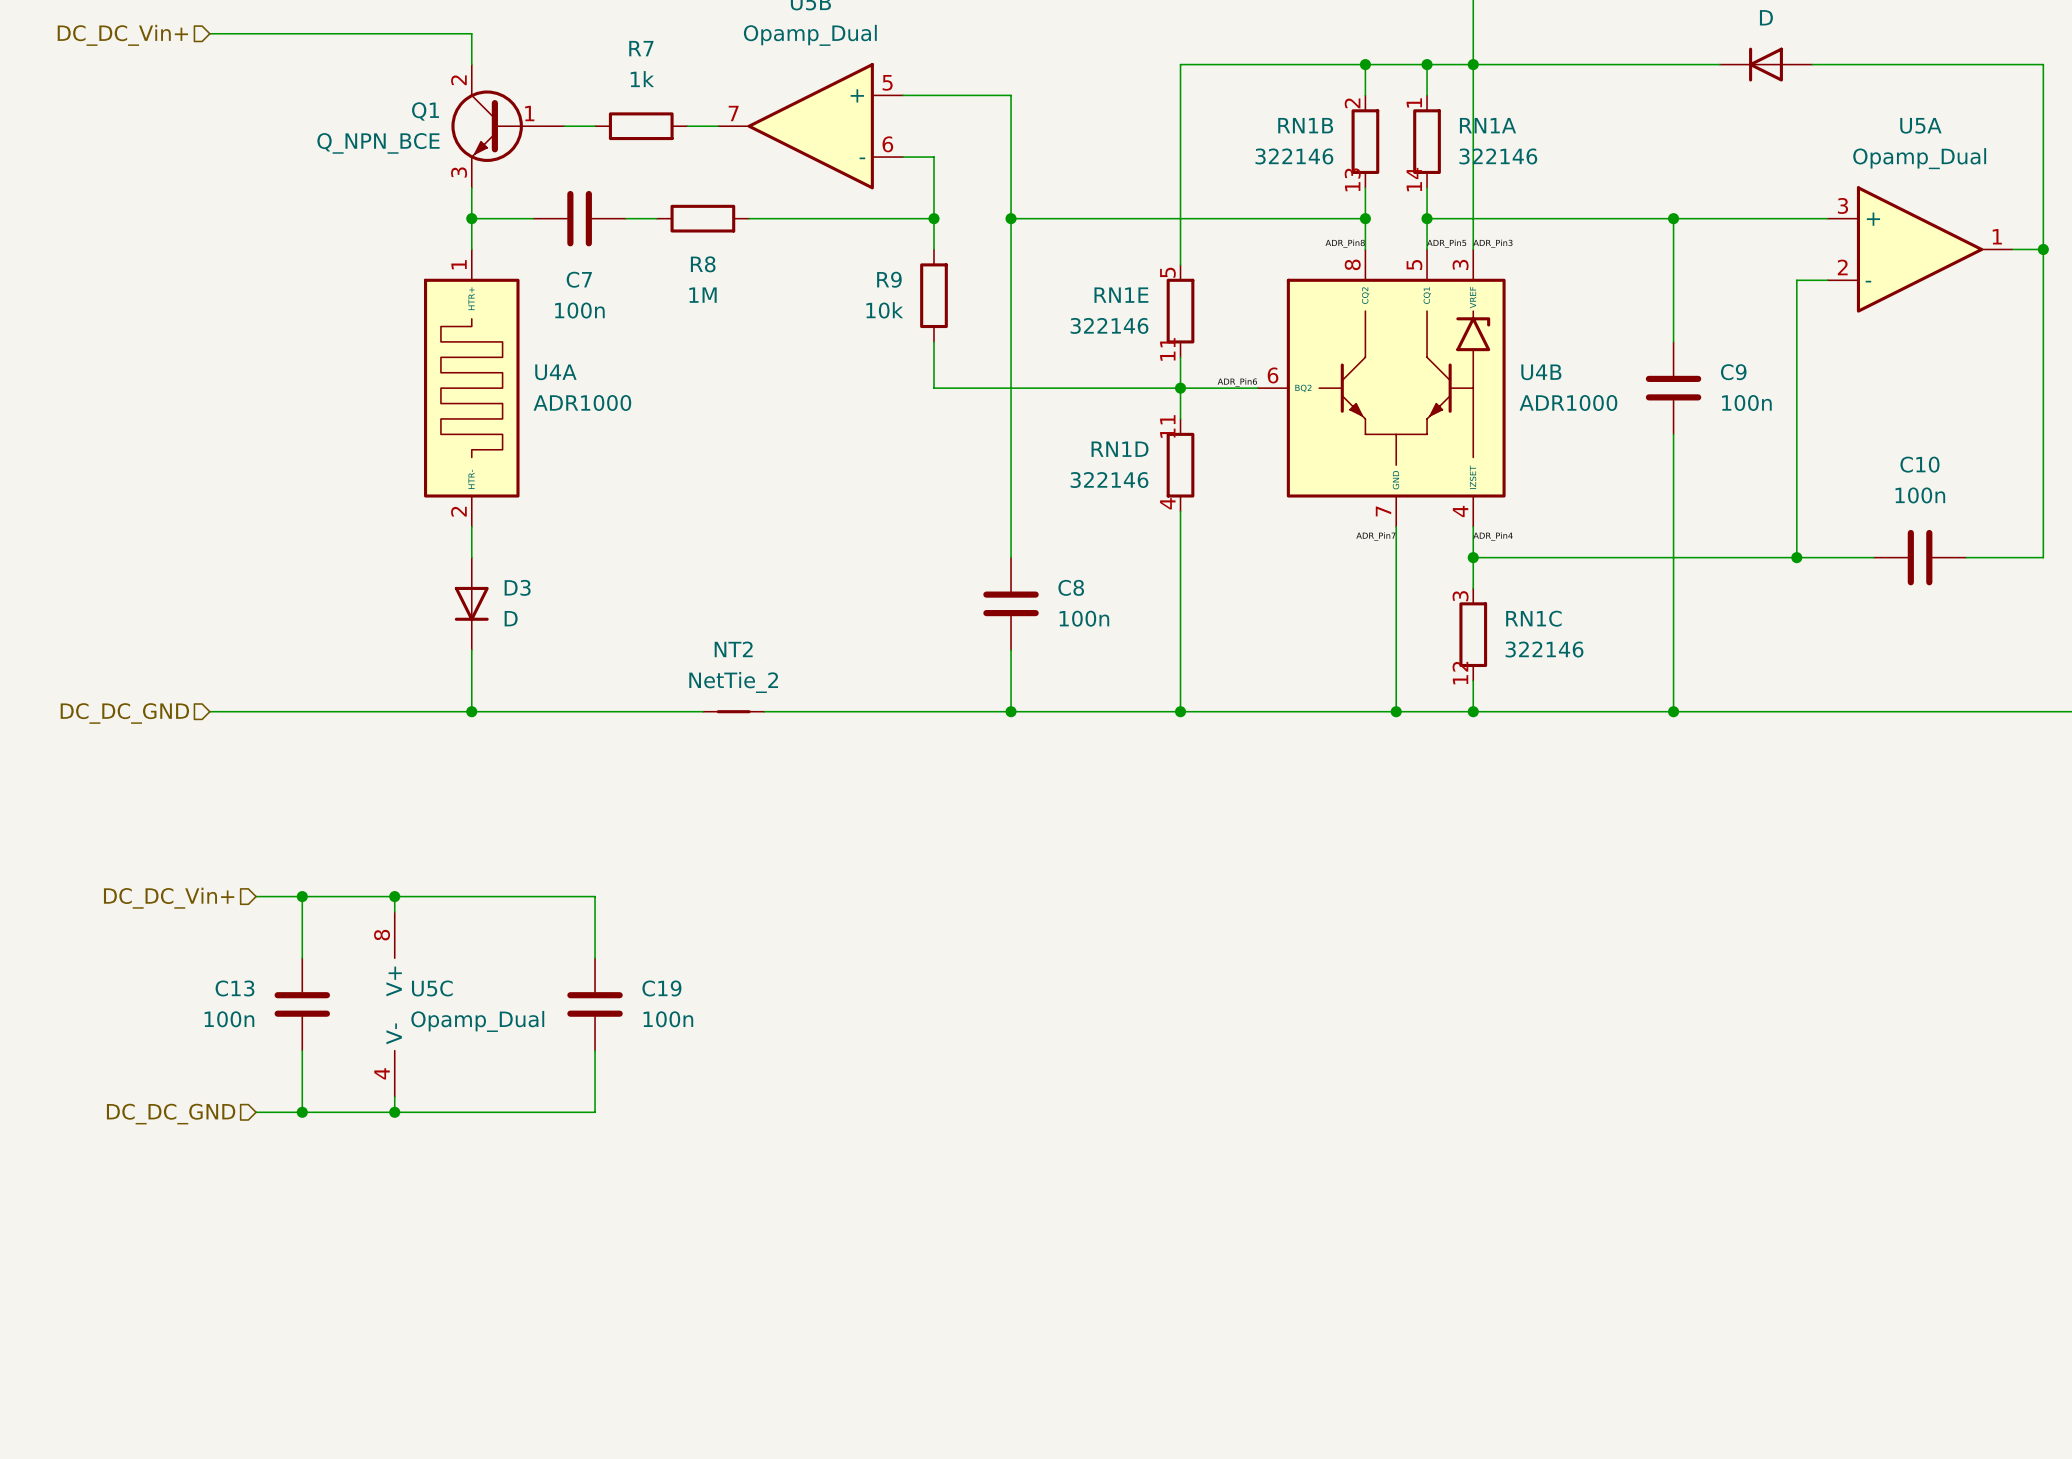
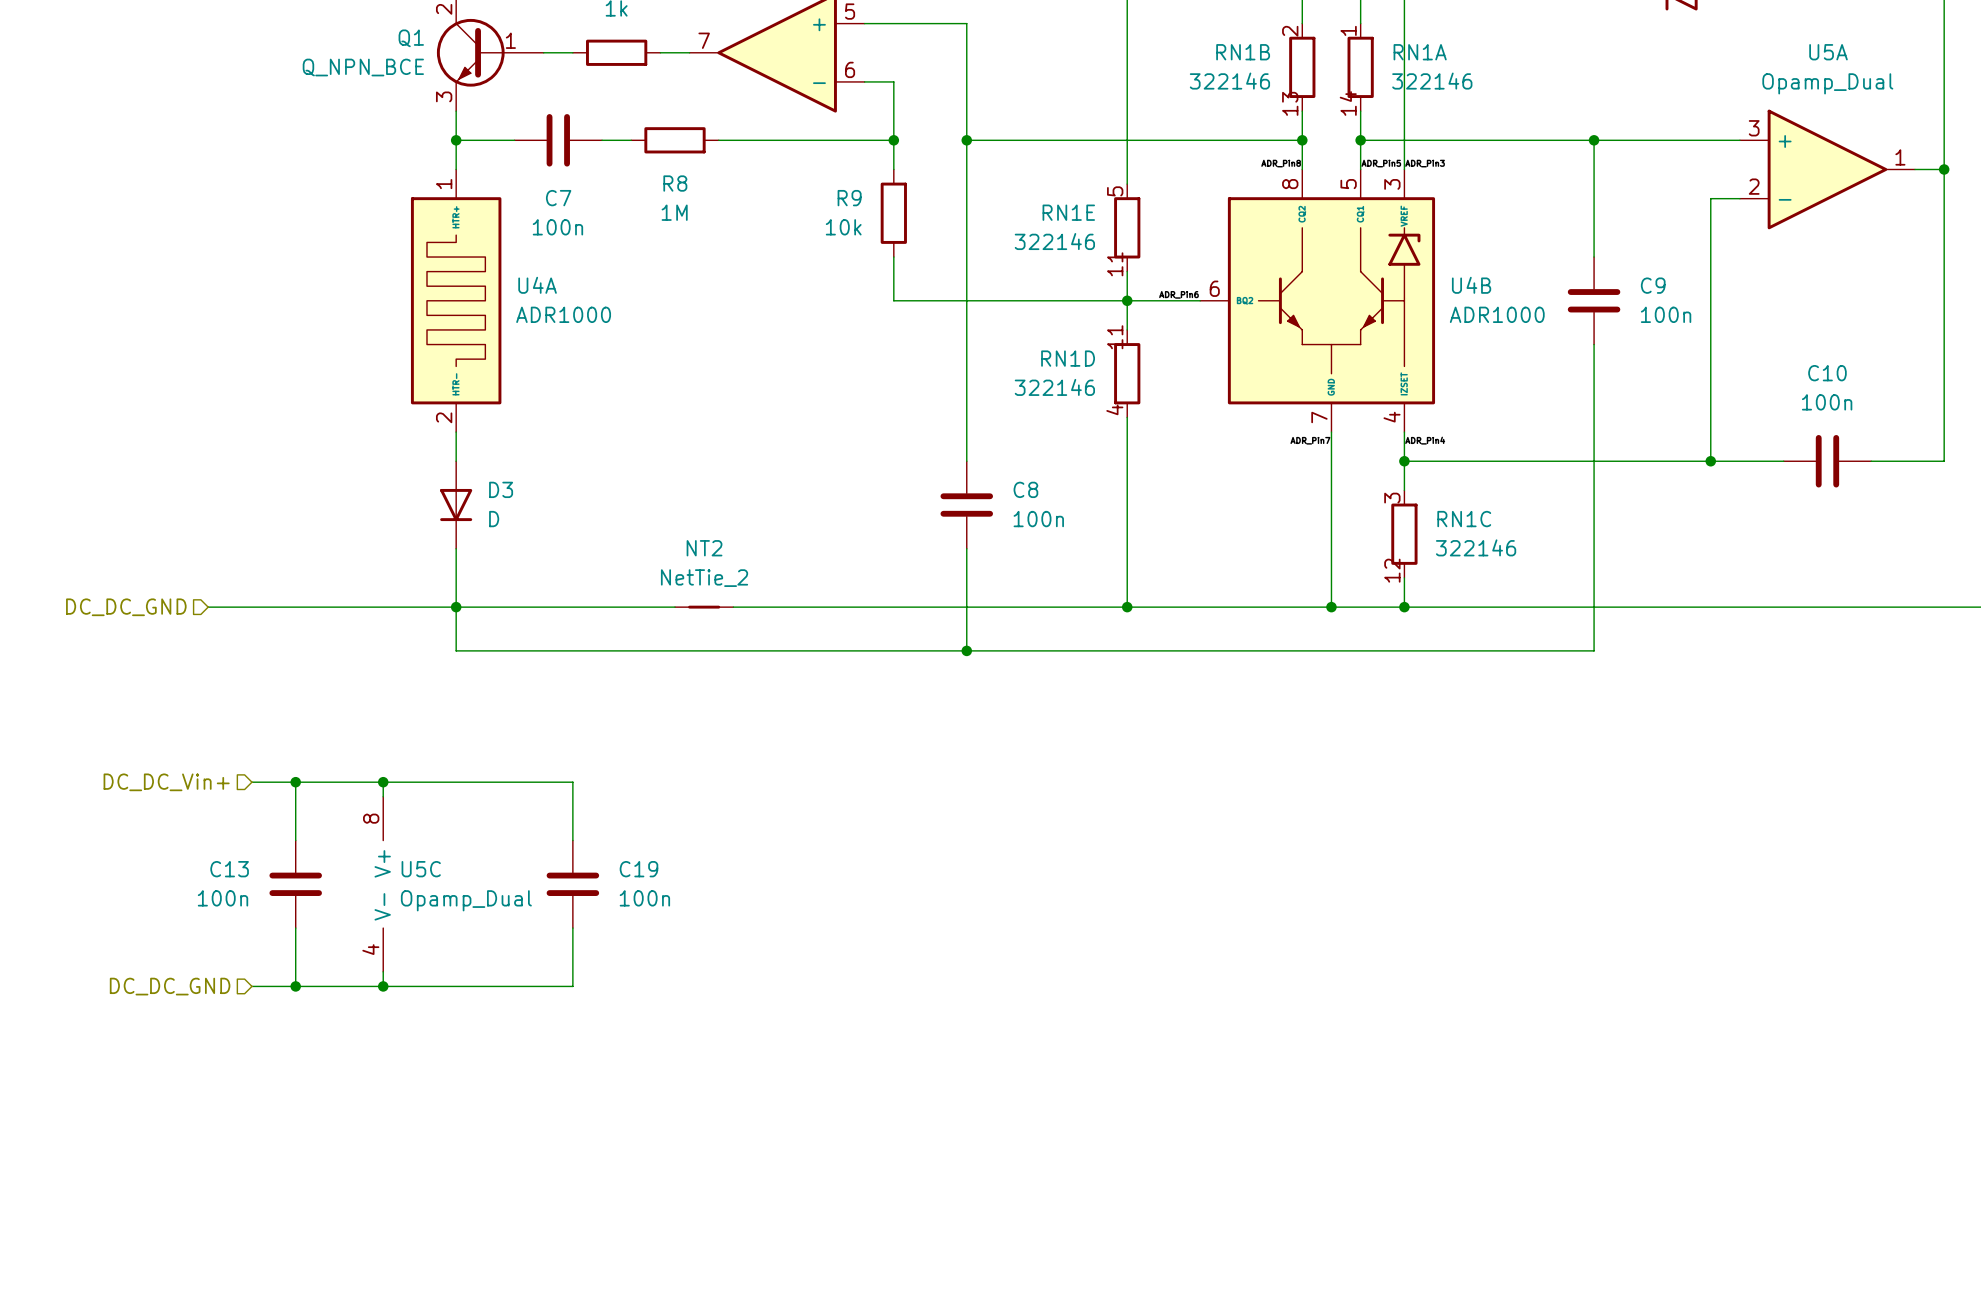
wire: none -> (456, 607) (456, 650) (1594, 650) (1594, 607)
wire: none -> (966, 607) (966, 650)
junction position: (1011, 711) -> (966, 650)
junction: (1673, 711) -> none

